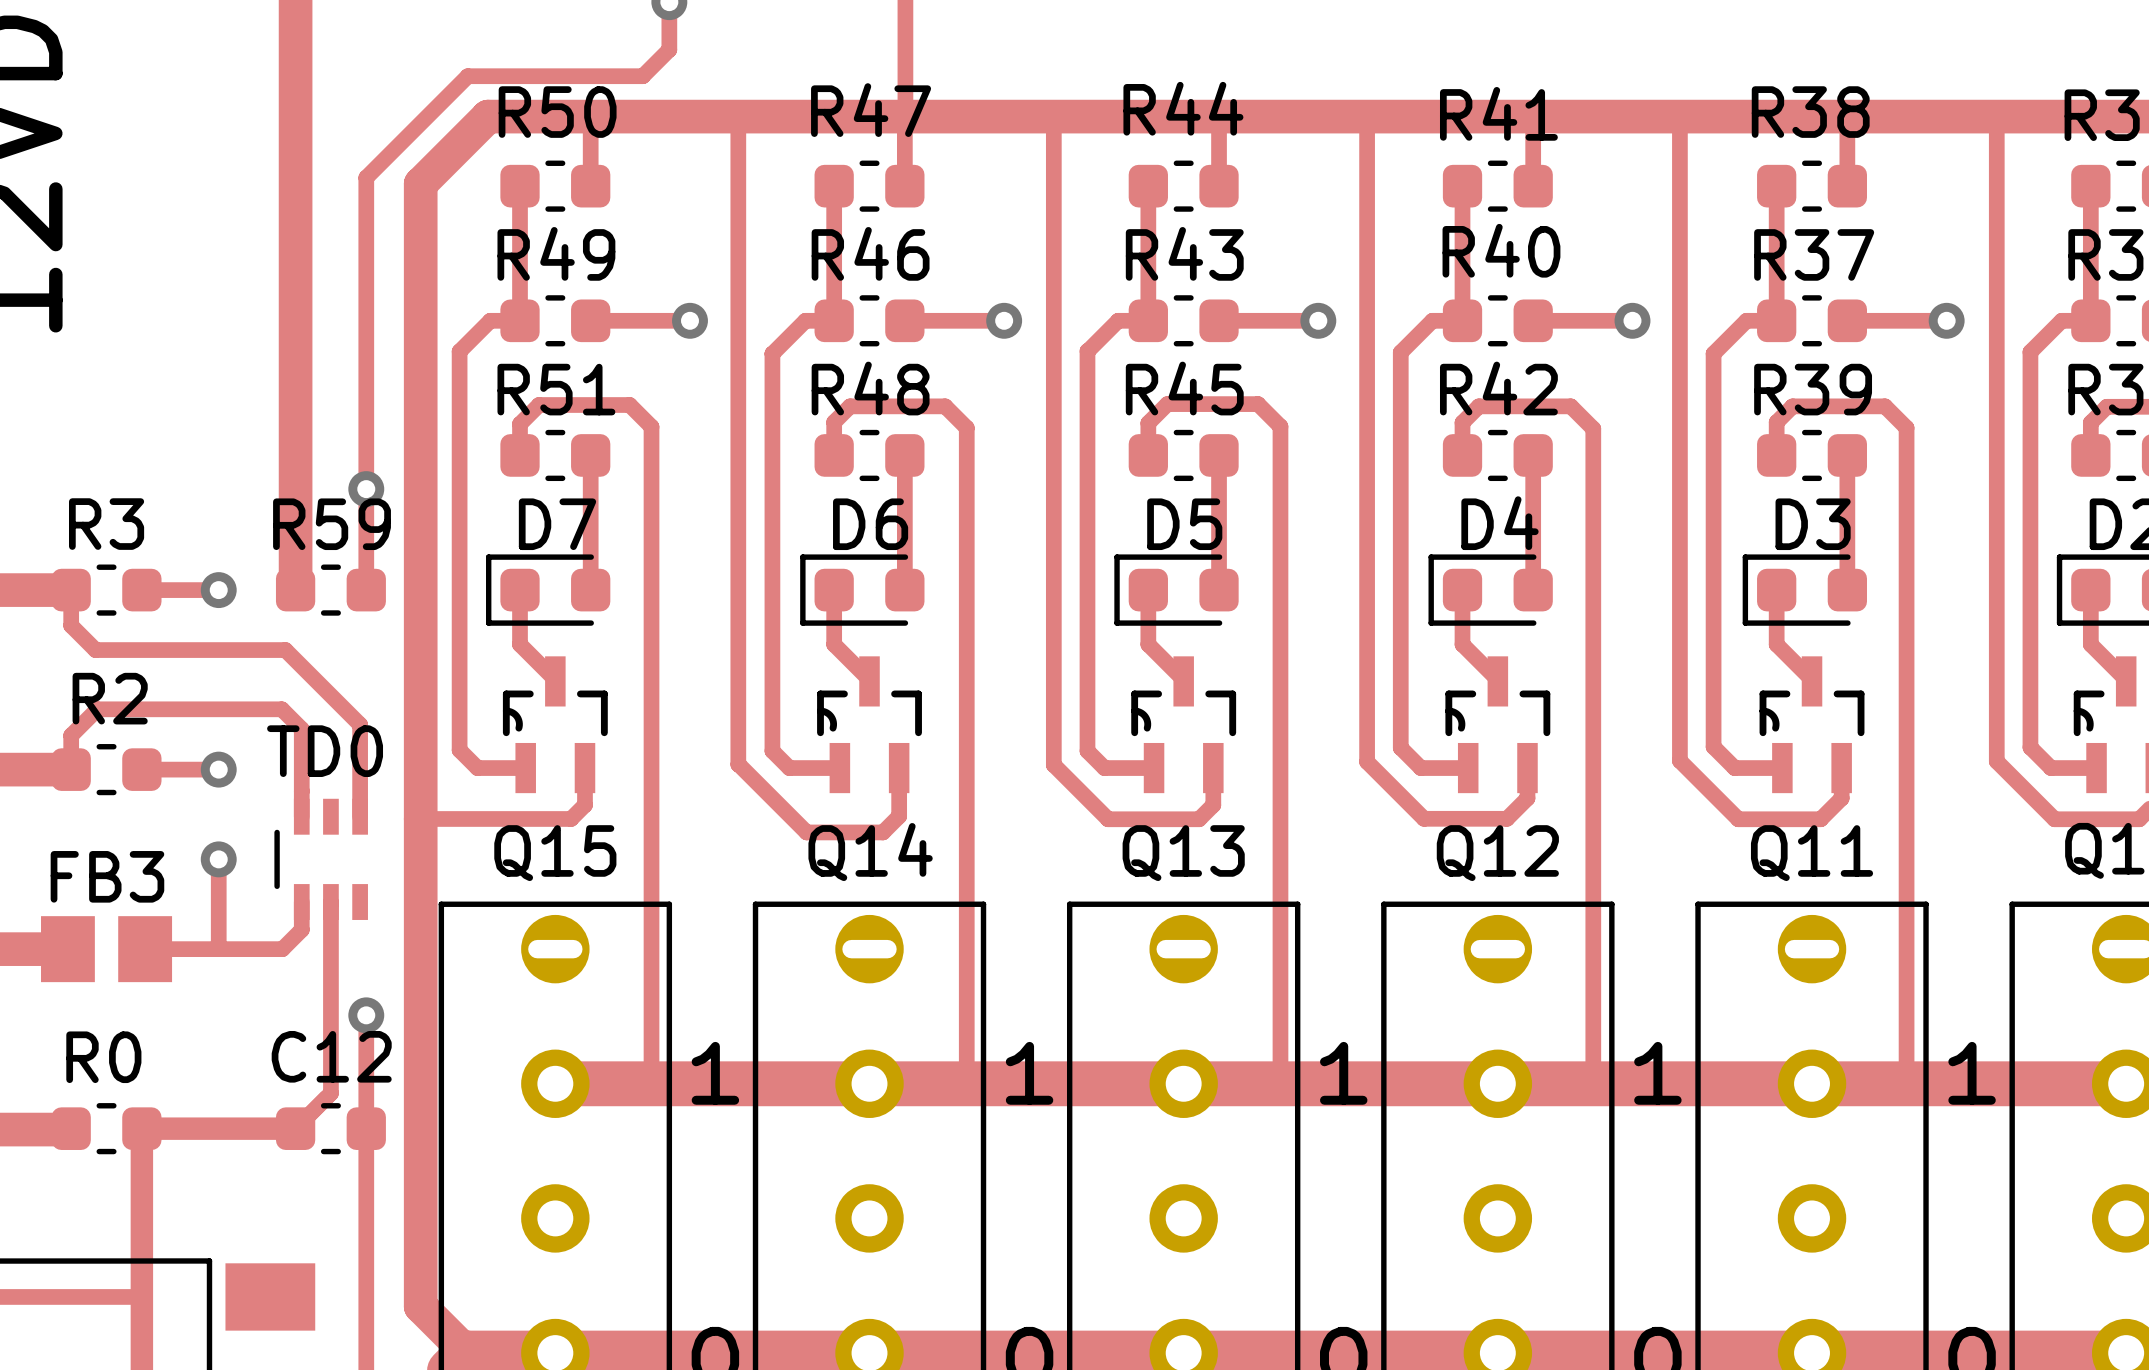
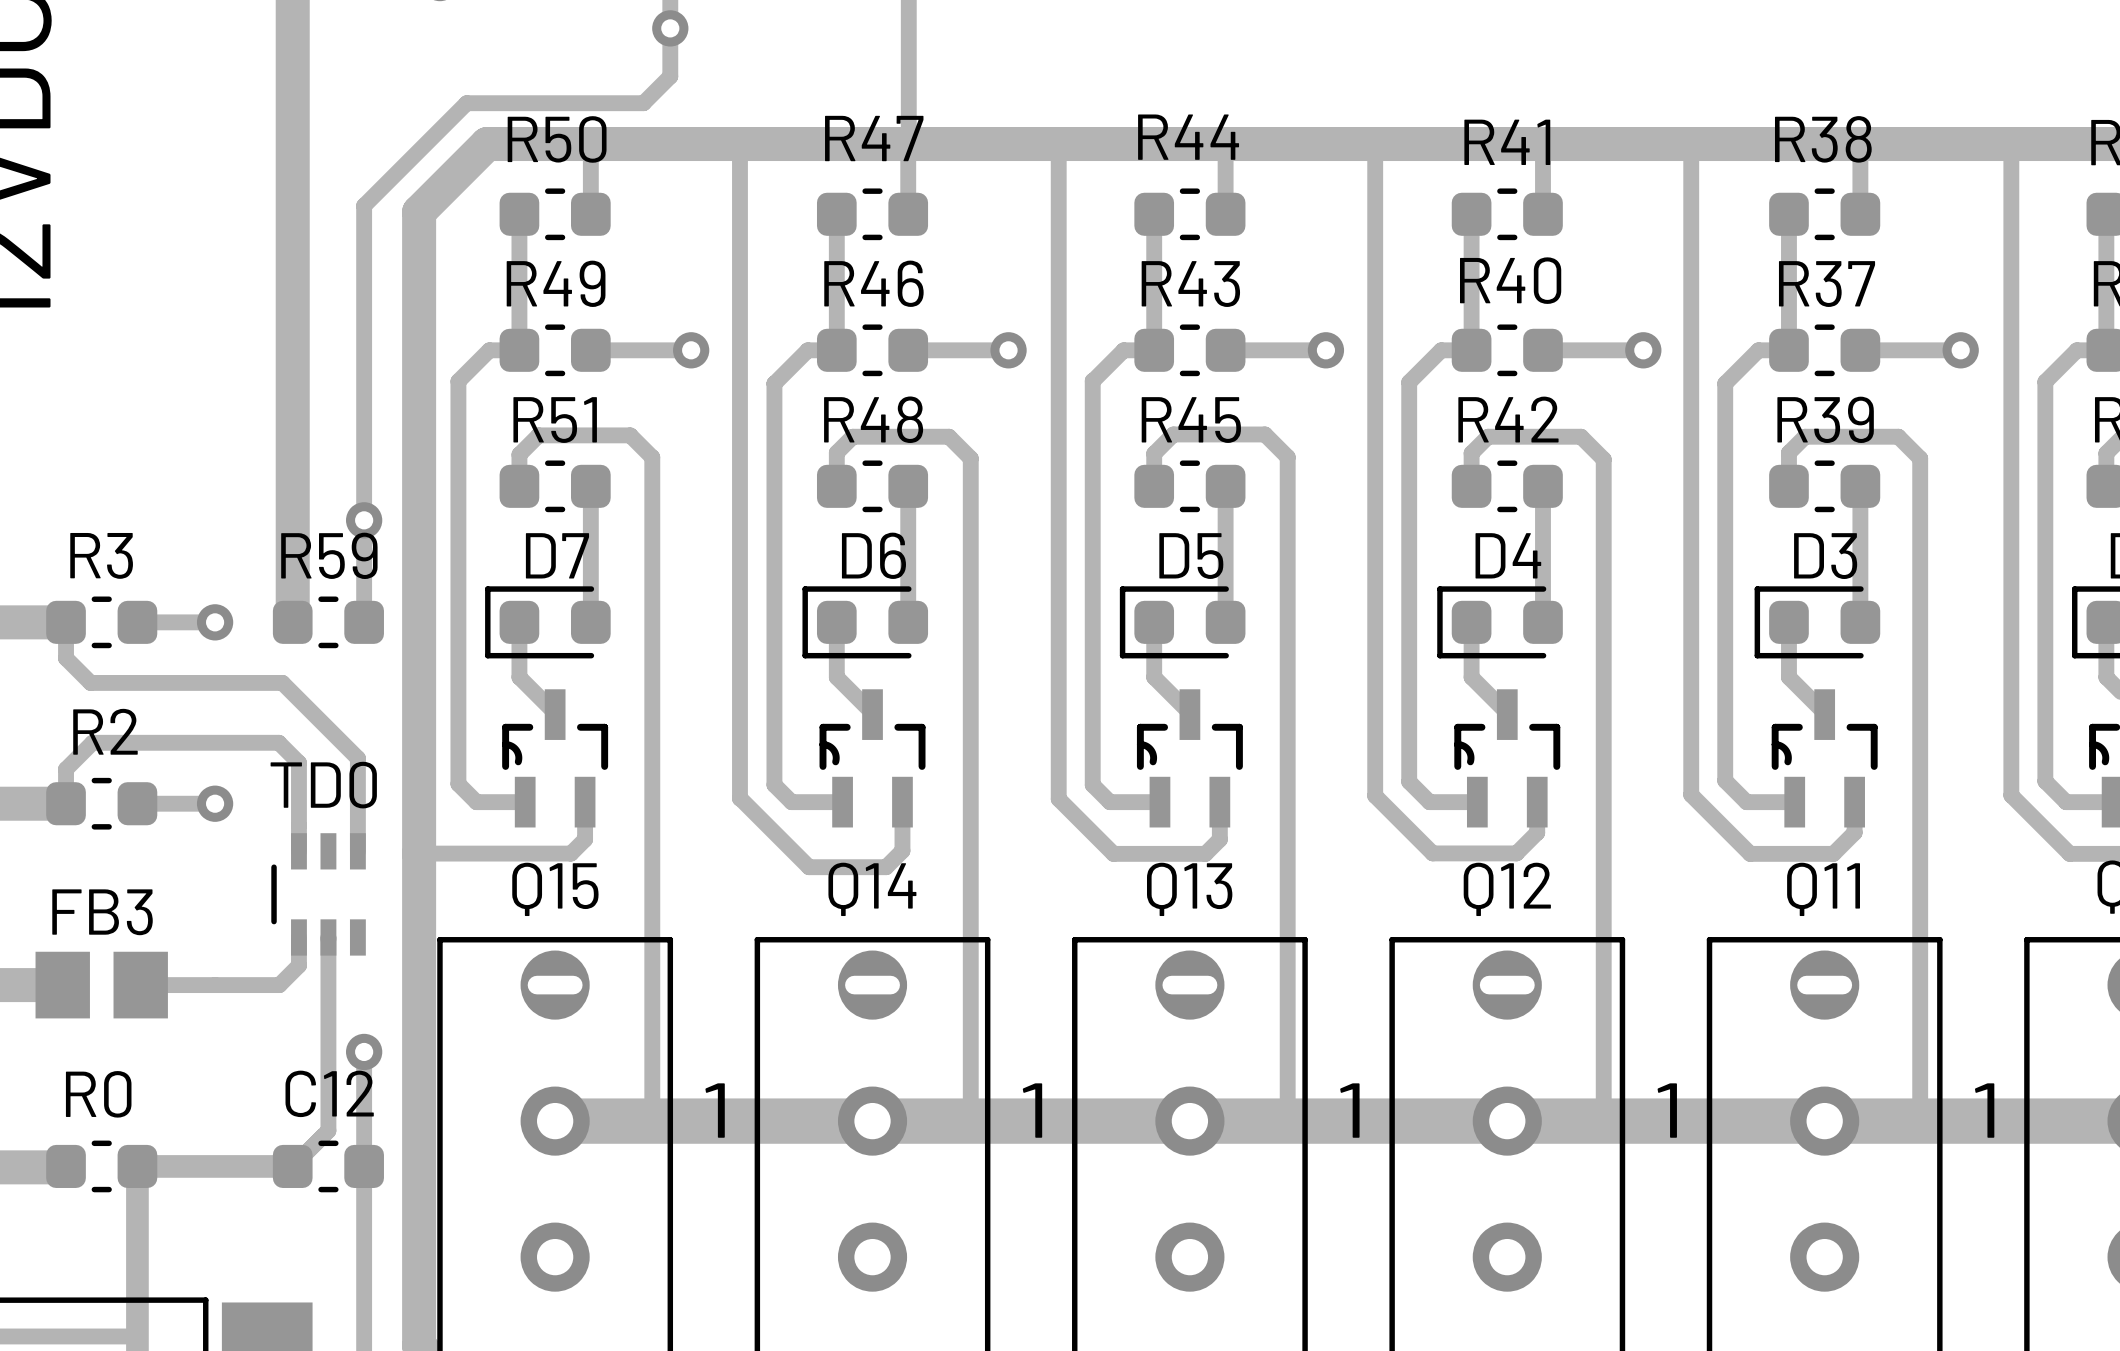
track: (218, 859) (218, 949) -> none
via: (218, 859) -> none

